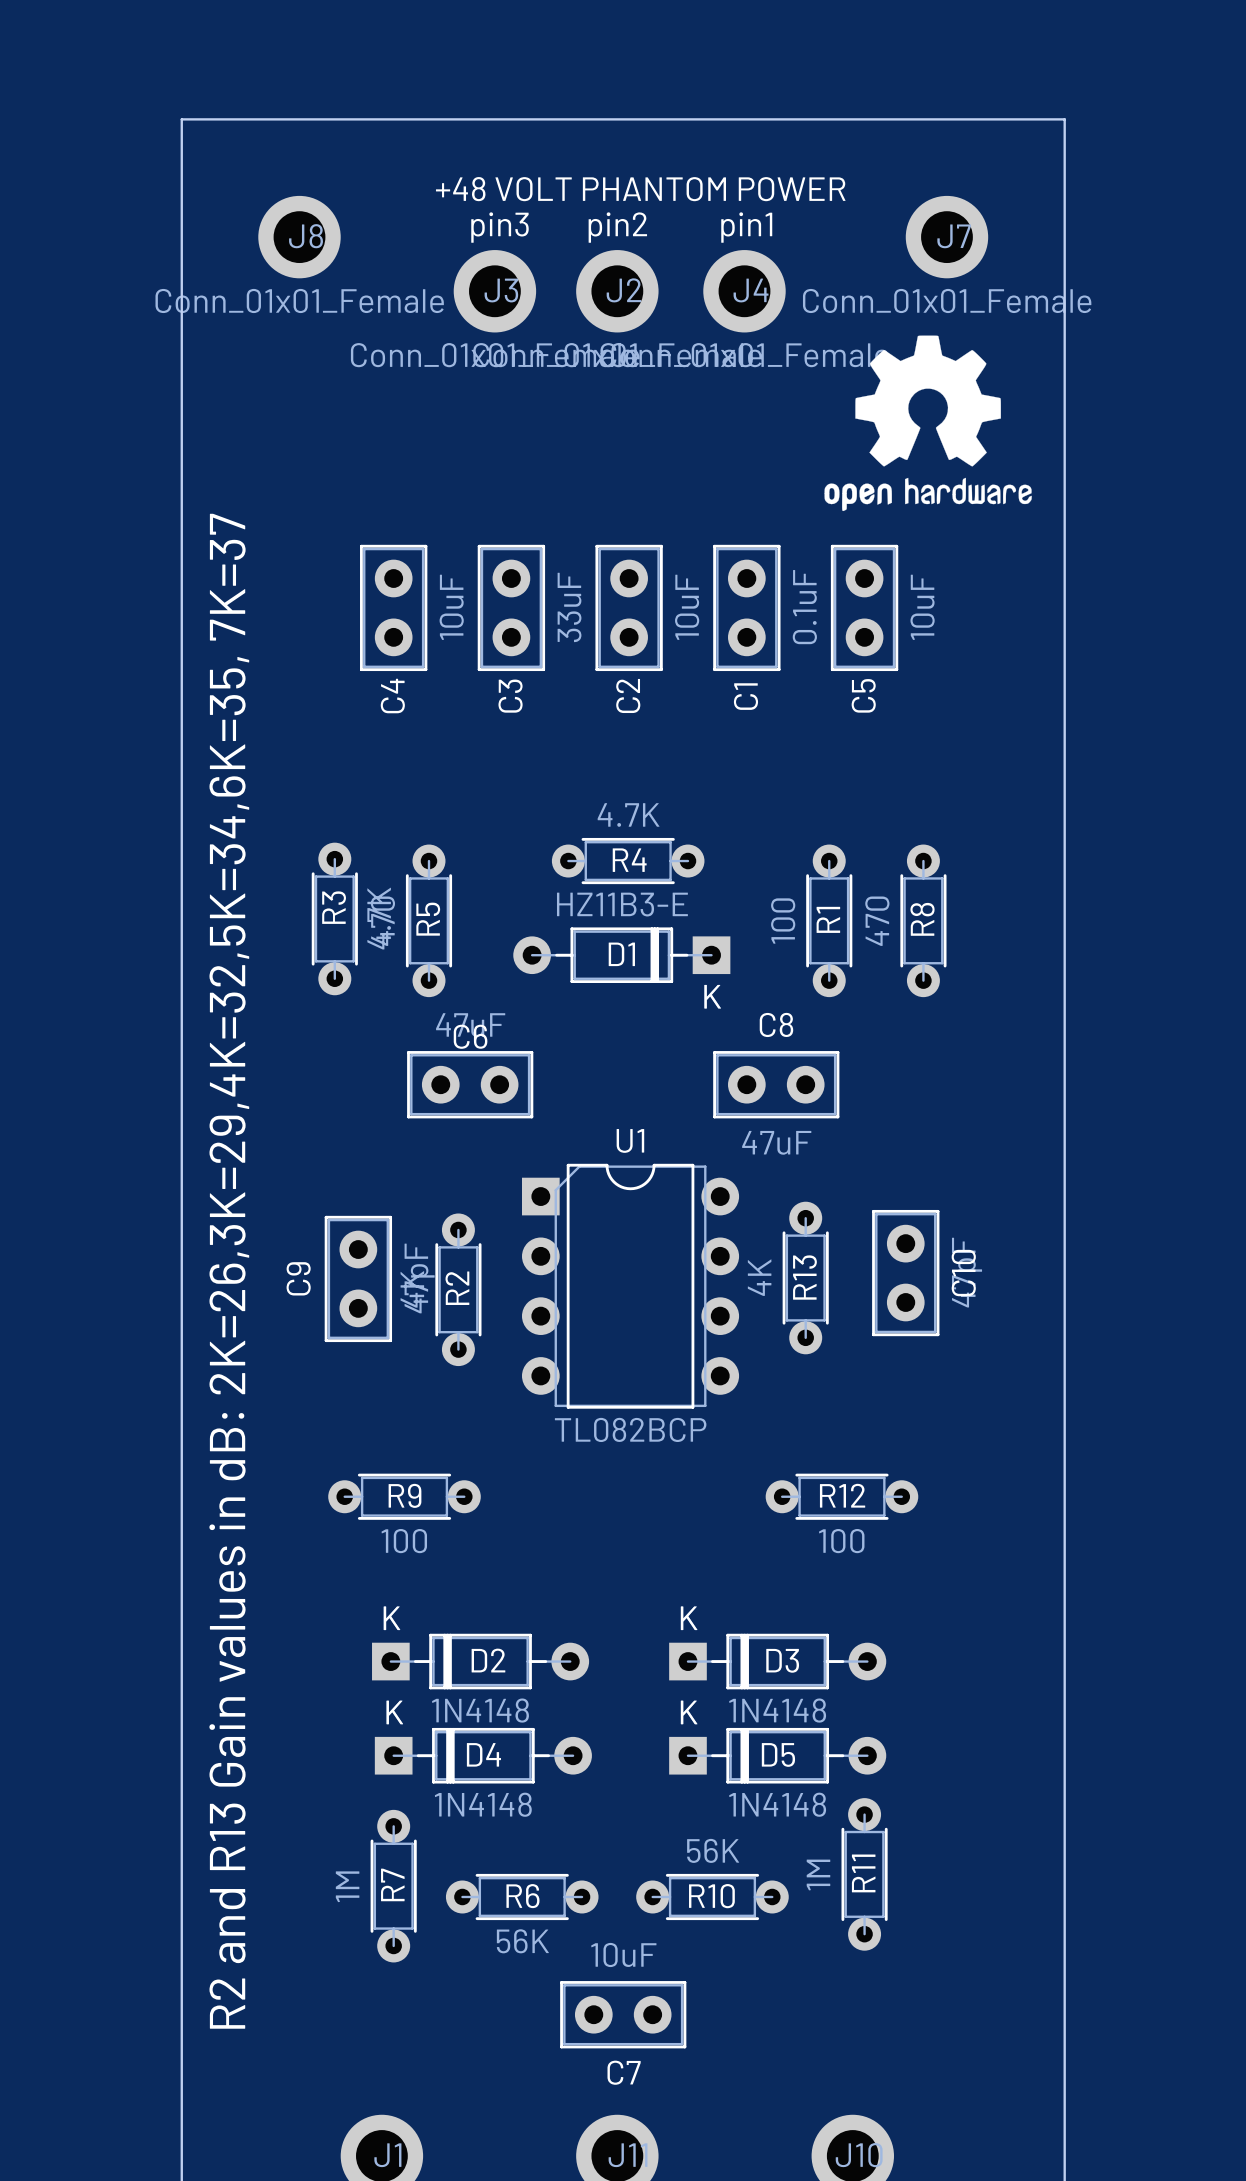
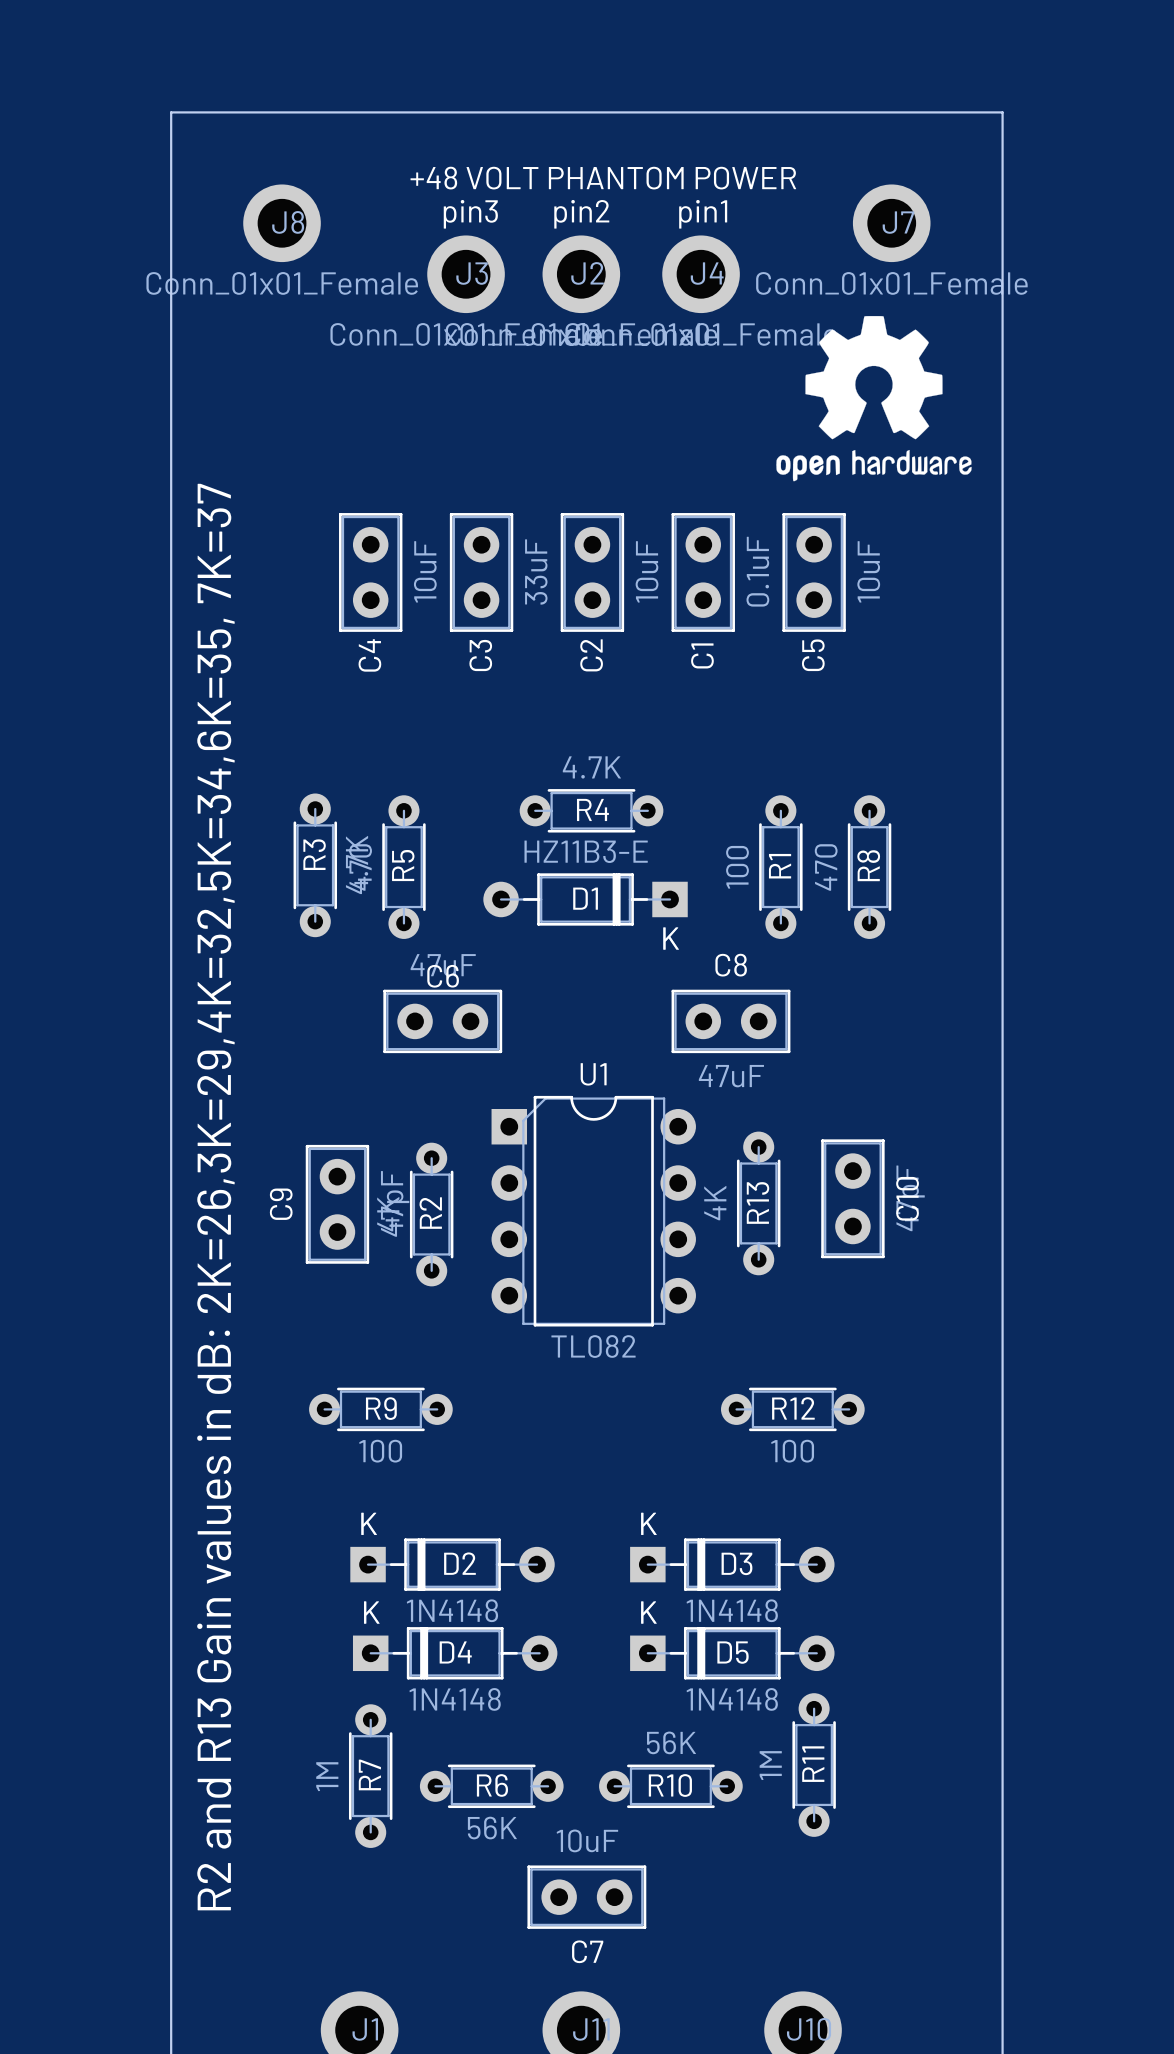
U1 value: TL082BCP (630, 1429) -> TL082 (593, 1346)

